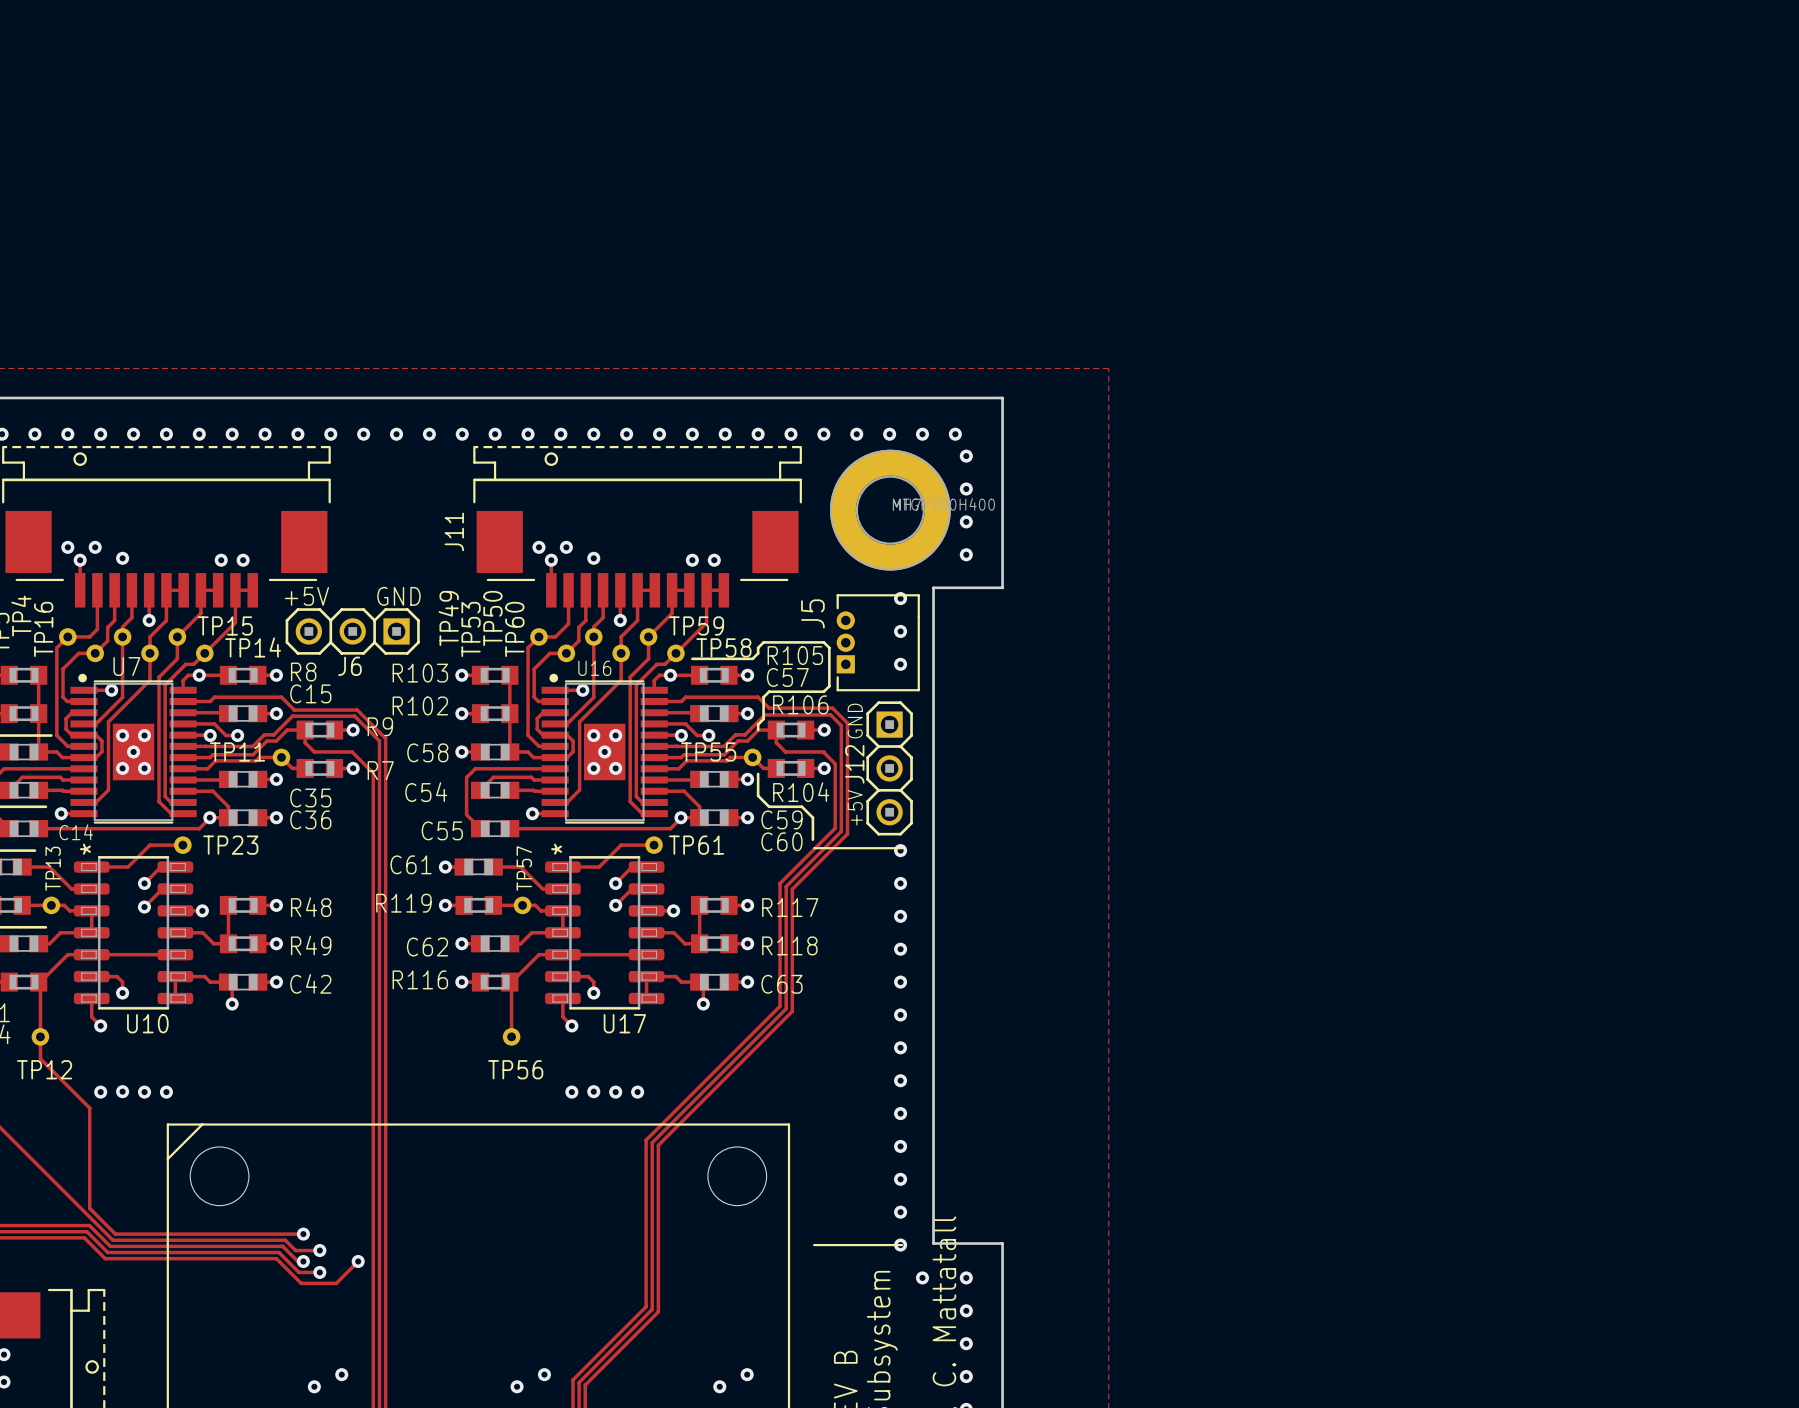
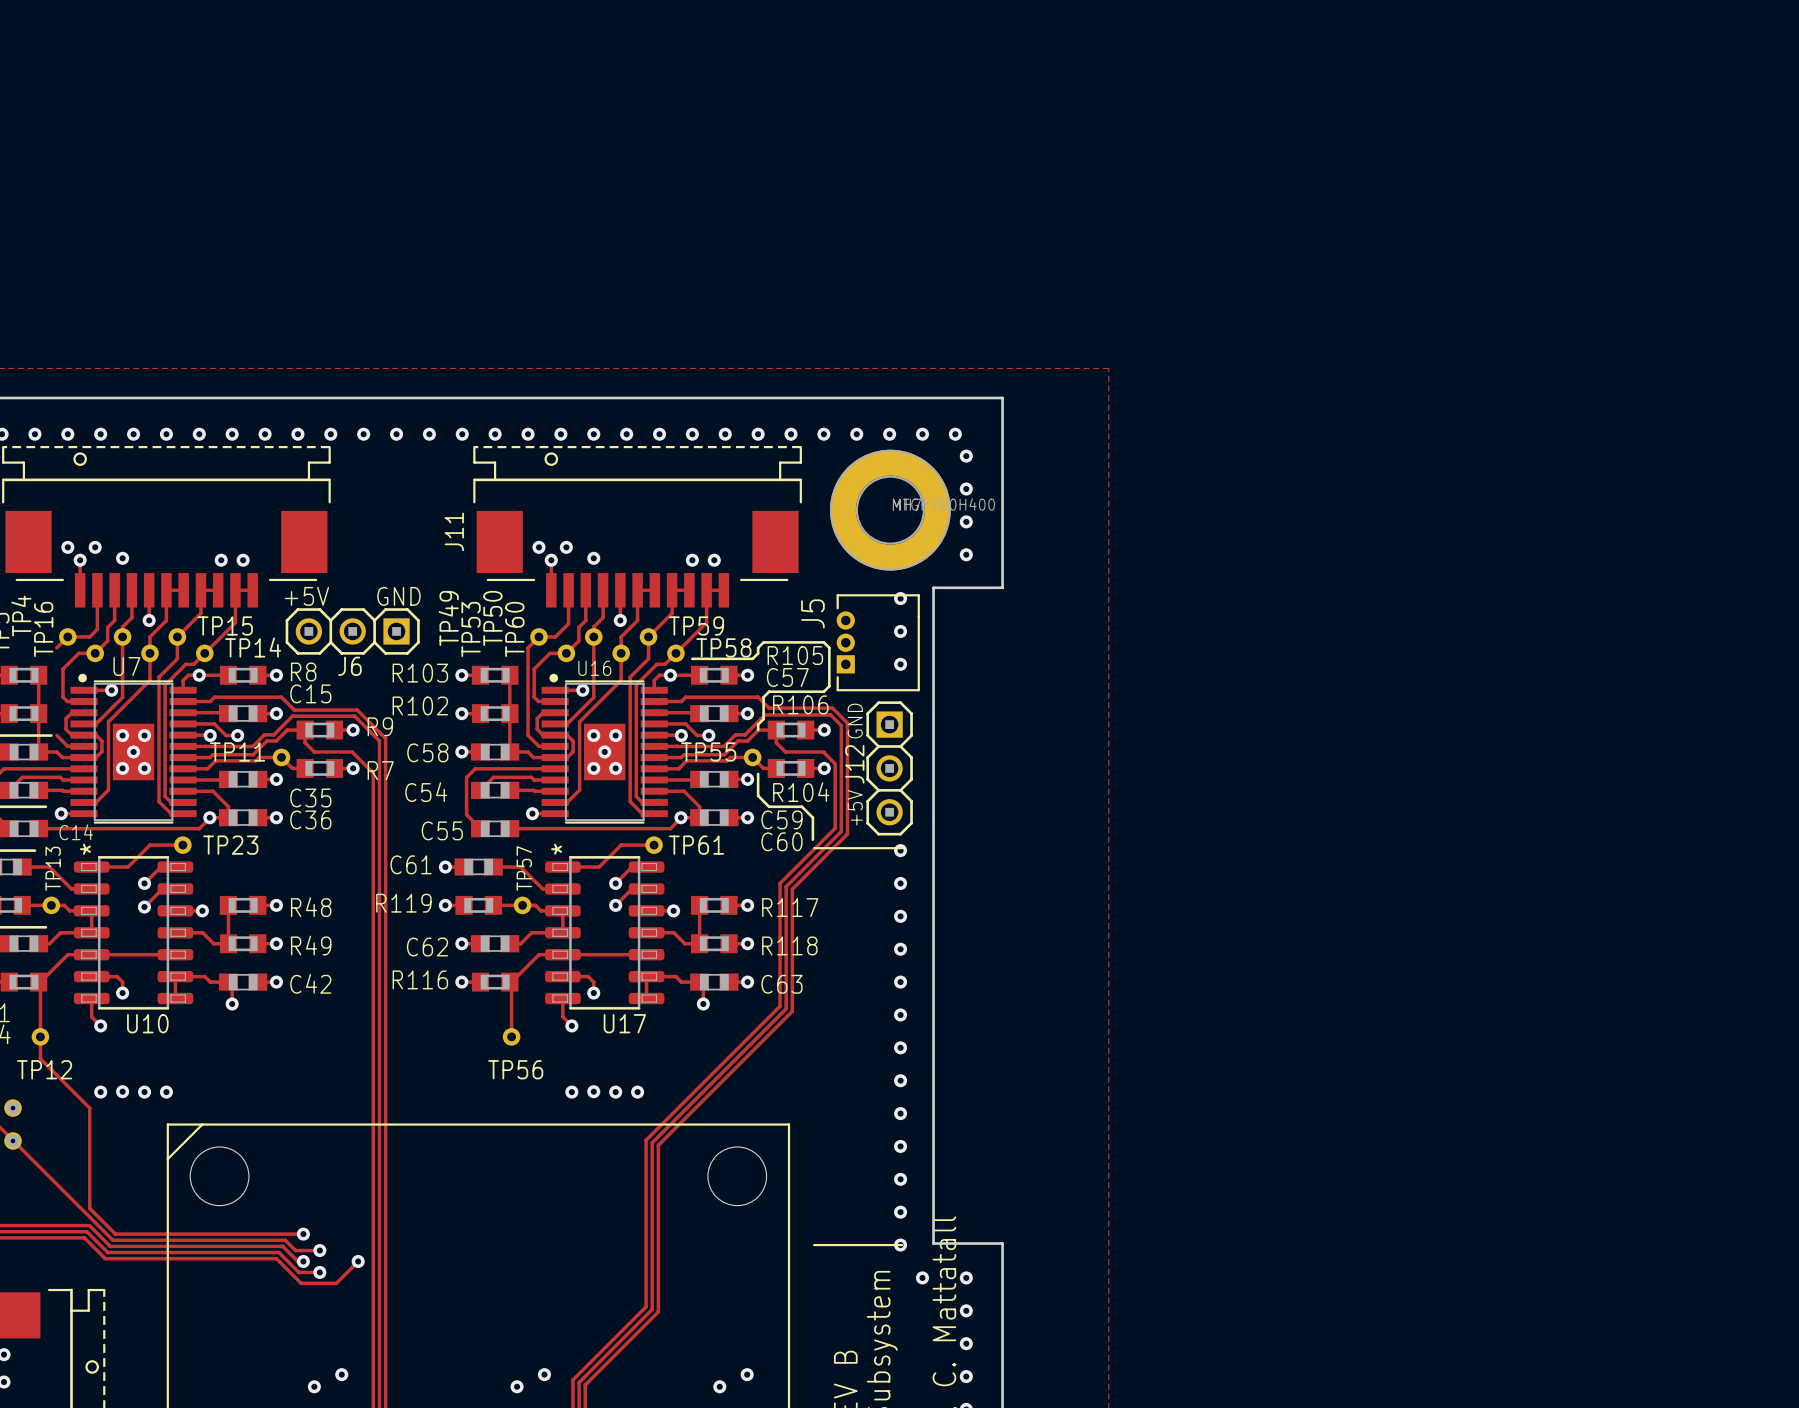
track: (56, 647) (56, 735) -> none
part: none -> (13, 1108)
part: none -> (13, 1140)

